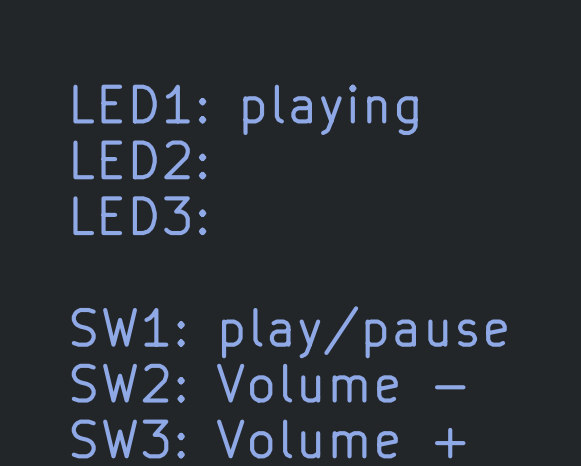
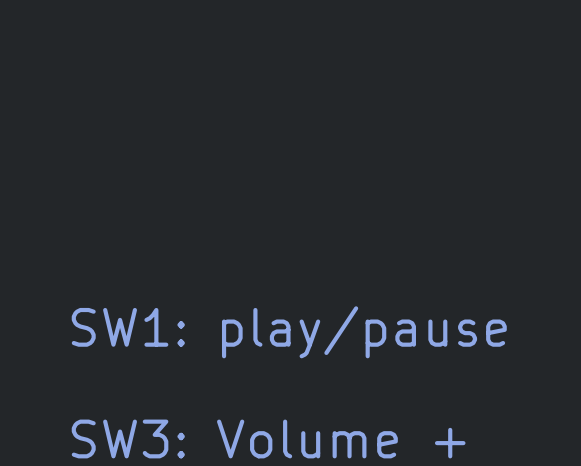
text: LED1: playing (245, 109) -> none
text: LED2: (139, 159) -> none
text: LED3: (139, 215) -> none
text: SW2: Volume - (268, 383) -> none

